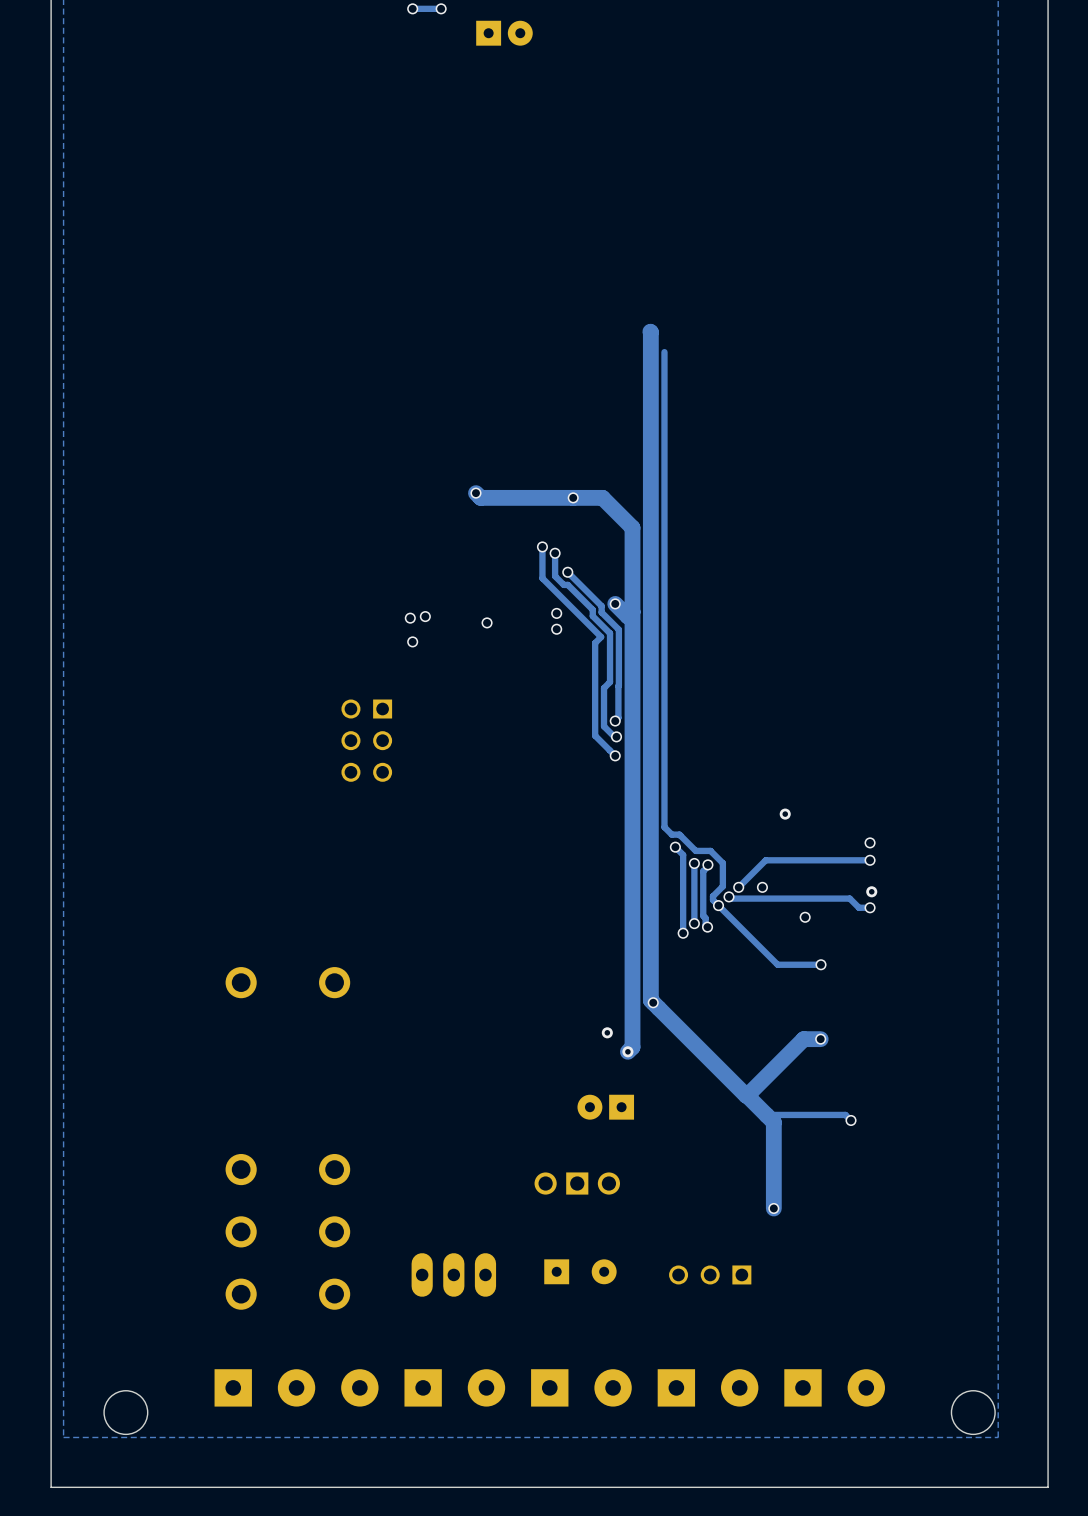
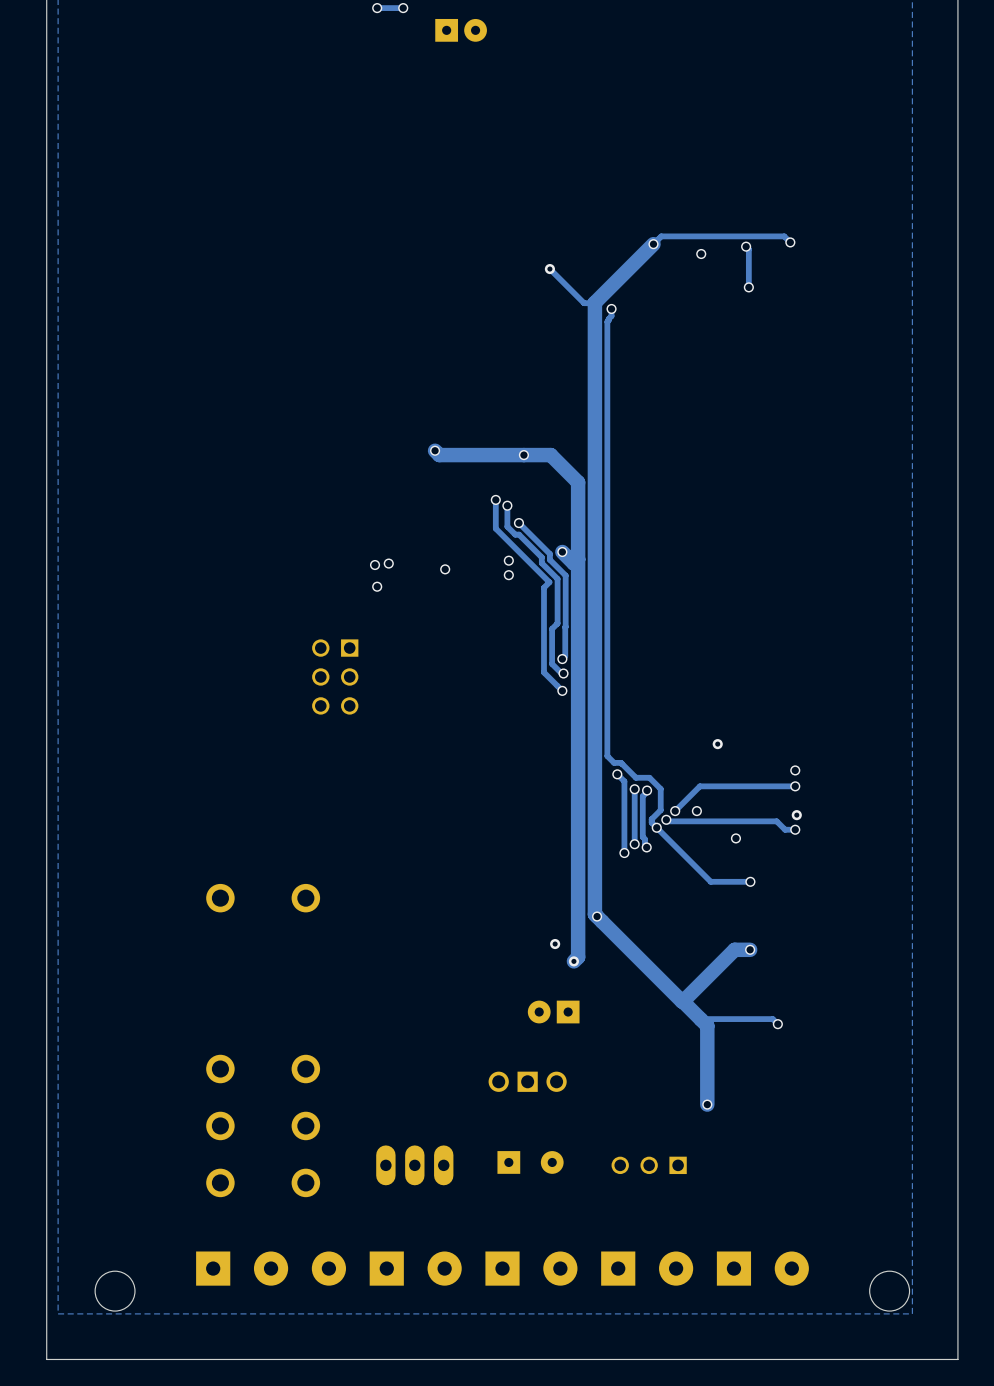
track: none -> (790, 242) (784, 236) (661, 236) (594, 303) (584, 303) (549, 269)
via: none -> (790, 242)
via: none -> (653, 244)
track: none -> (746, 246) (748, 249) (748, 287)
via: none -> (746, 246)
via: none -> (701, 254)
via: none -> (549, 269)
via: none -> (748, 287)
track: none -> (611, 308) (611, 316) (607, 321)
via: none -> (611, 308)

